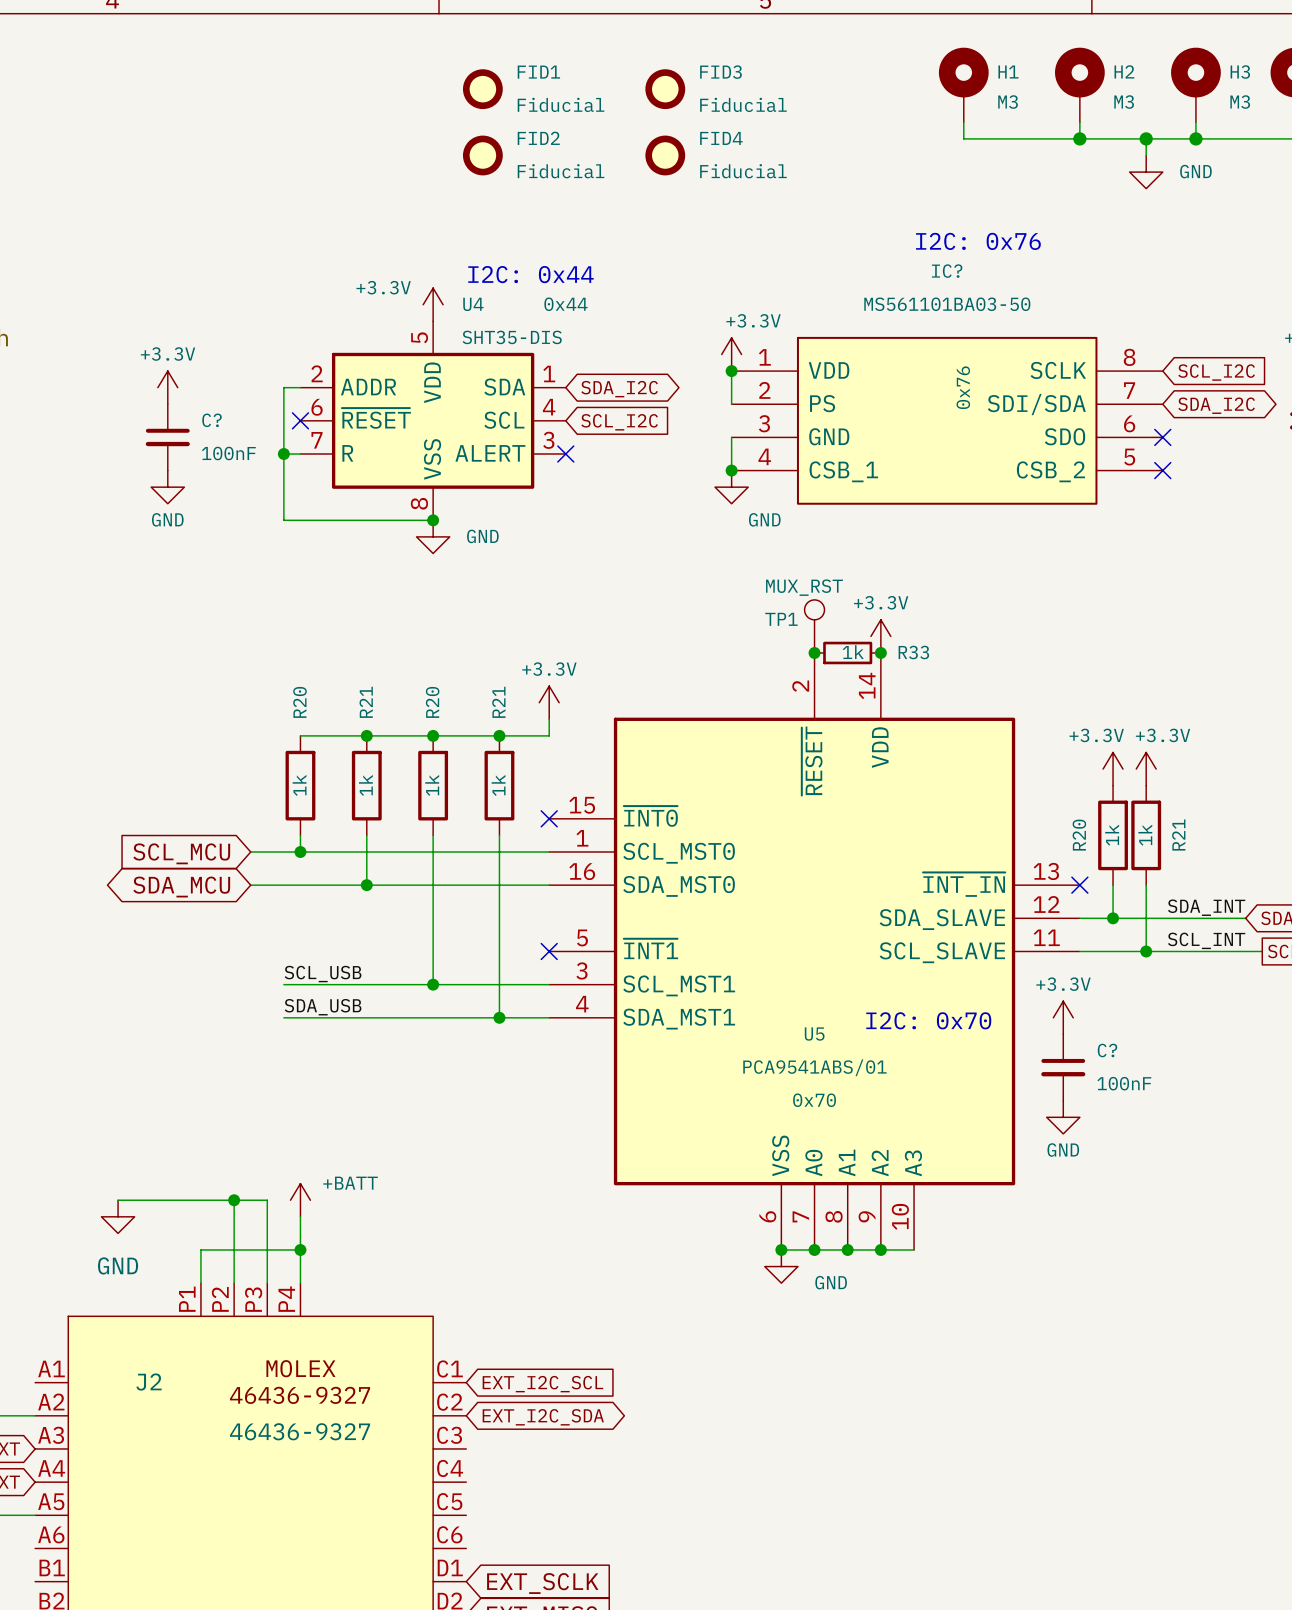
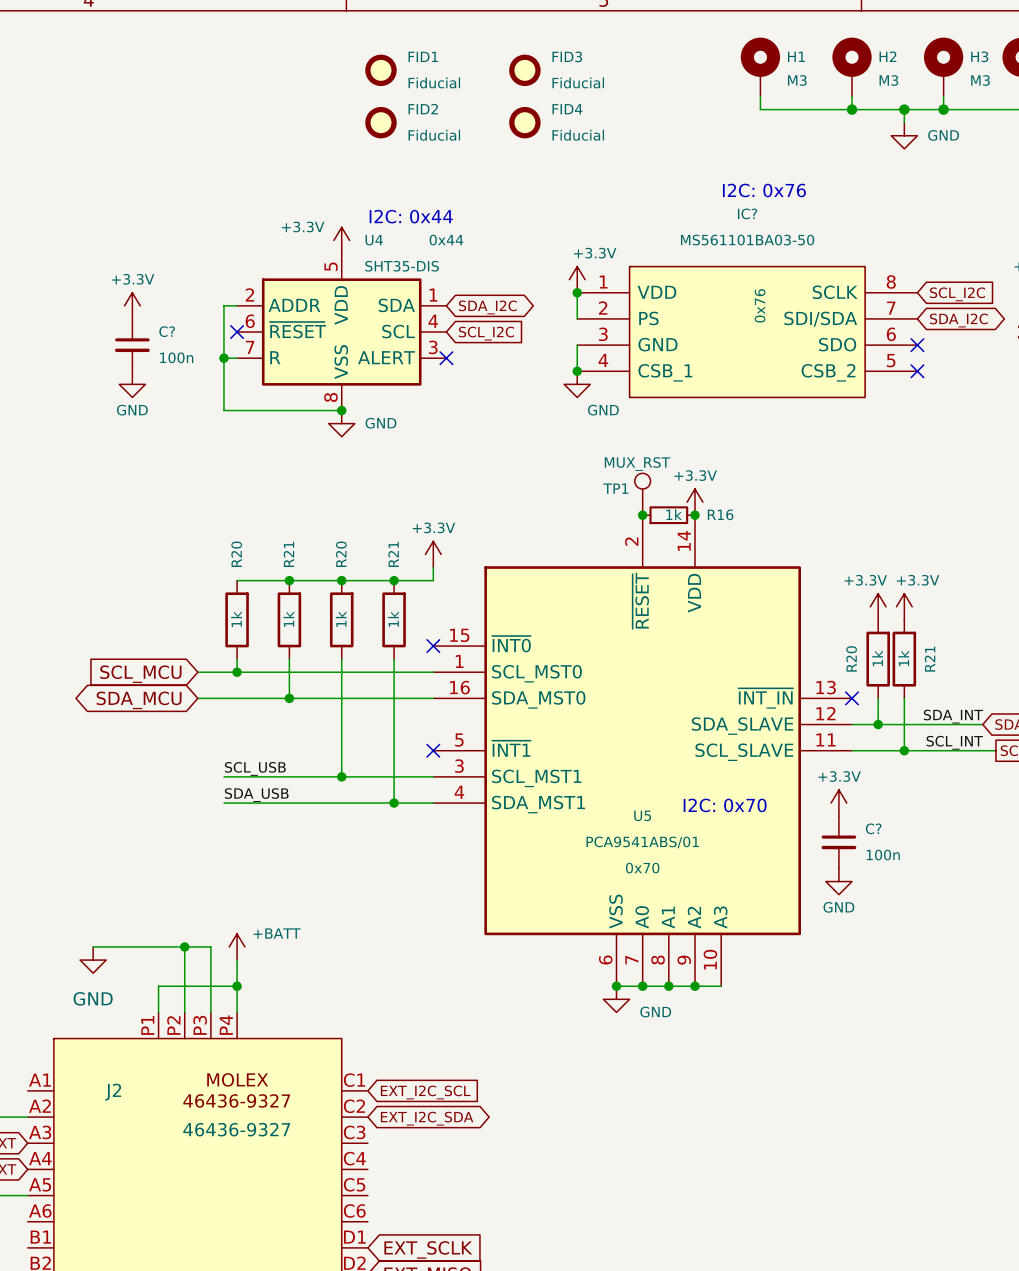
C? value: 100nF (228, 453) -> 100n (176, 357)
R33 name: R33 (913, 652) -> R16 (720, 514)
C? value: 100nF (1124, 1083) -> 100n (883, 855)

